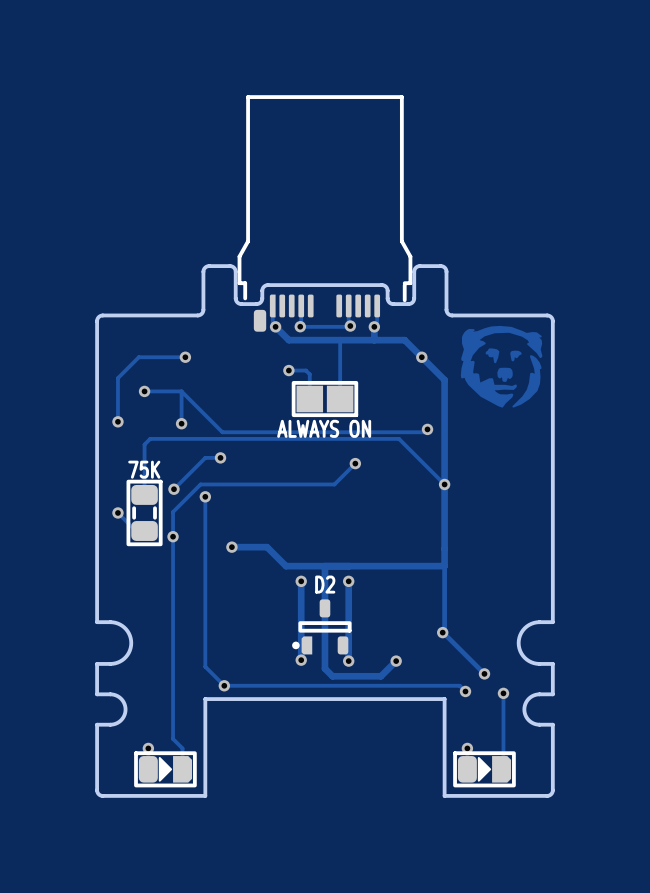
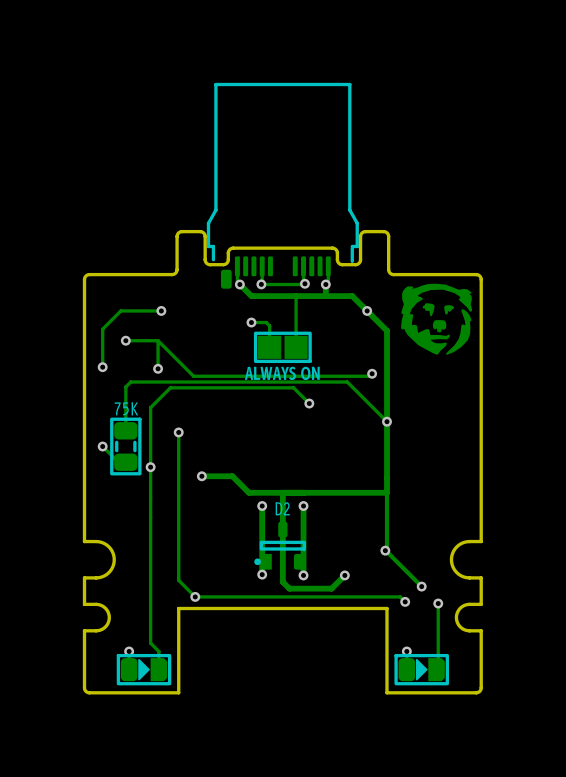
track: (220, 457) (205, 457) (173, 489) -> none
via: (220, 457) -> none
track: (355, 463) (334, 484) (200, 484) (173, 512) -> (309, 403) (293, 387) (170, 387) (150, 407) (150, 445)
via: (173, 489) -> none

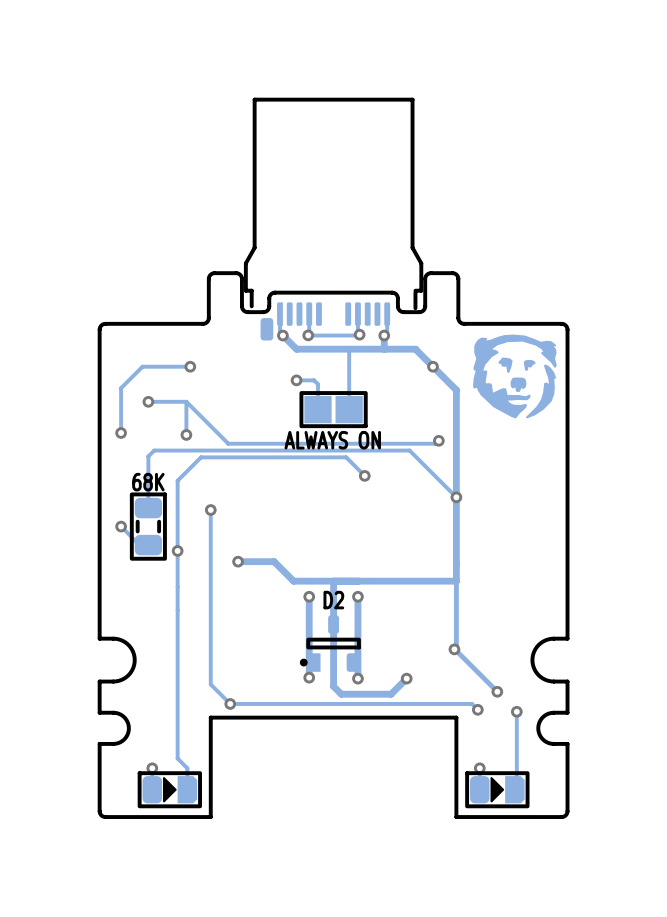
part value: 75K (126, 408) -> 68K (148, 482)

